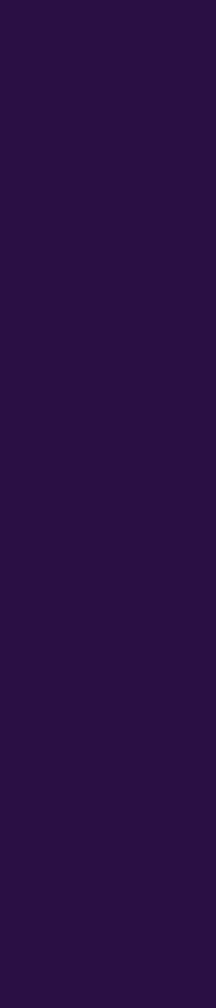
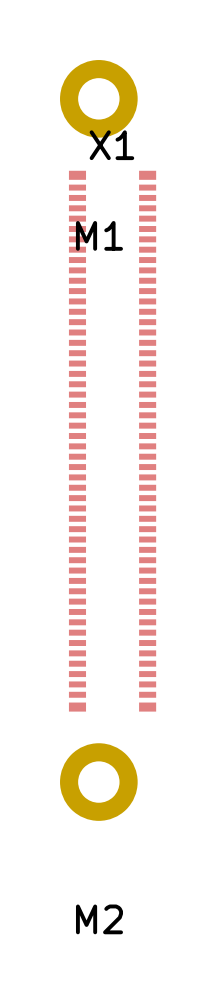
M1: none -> (98, 98)
X1: none -> (112, 441)
M2: none -> (98, 782)

